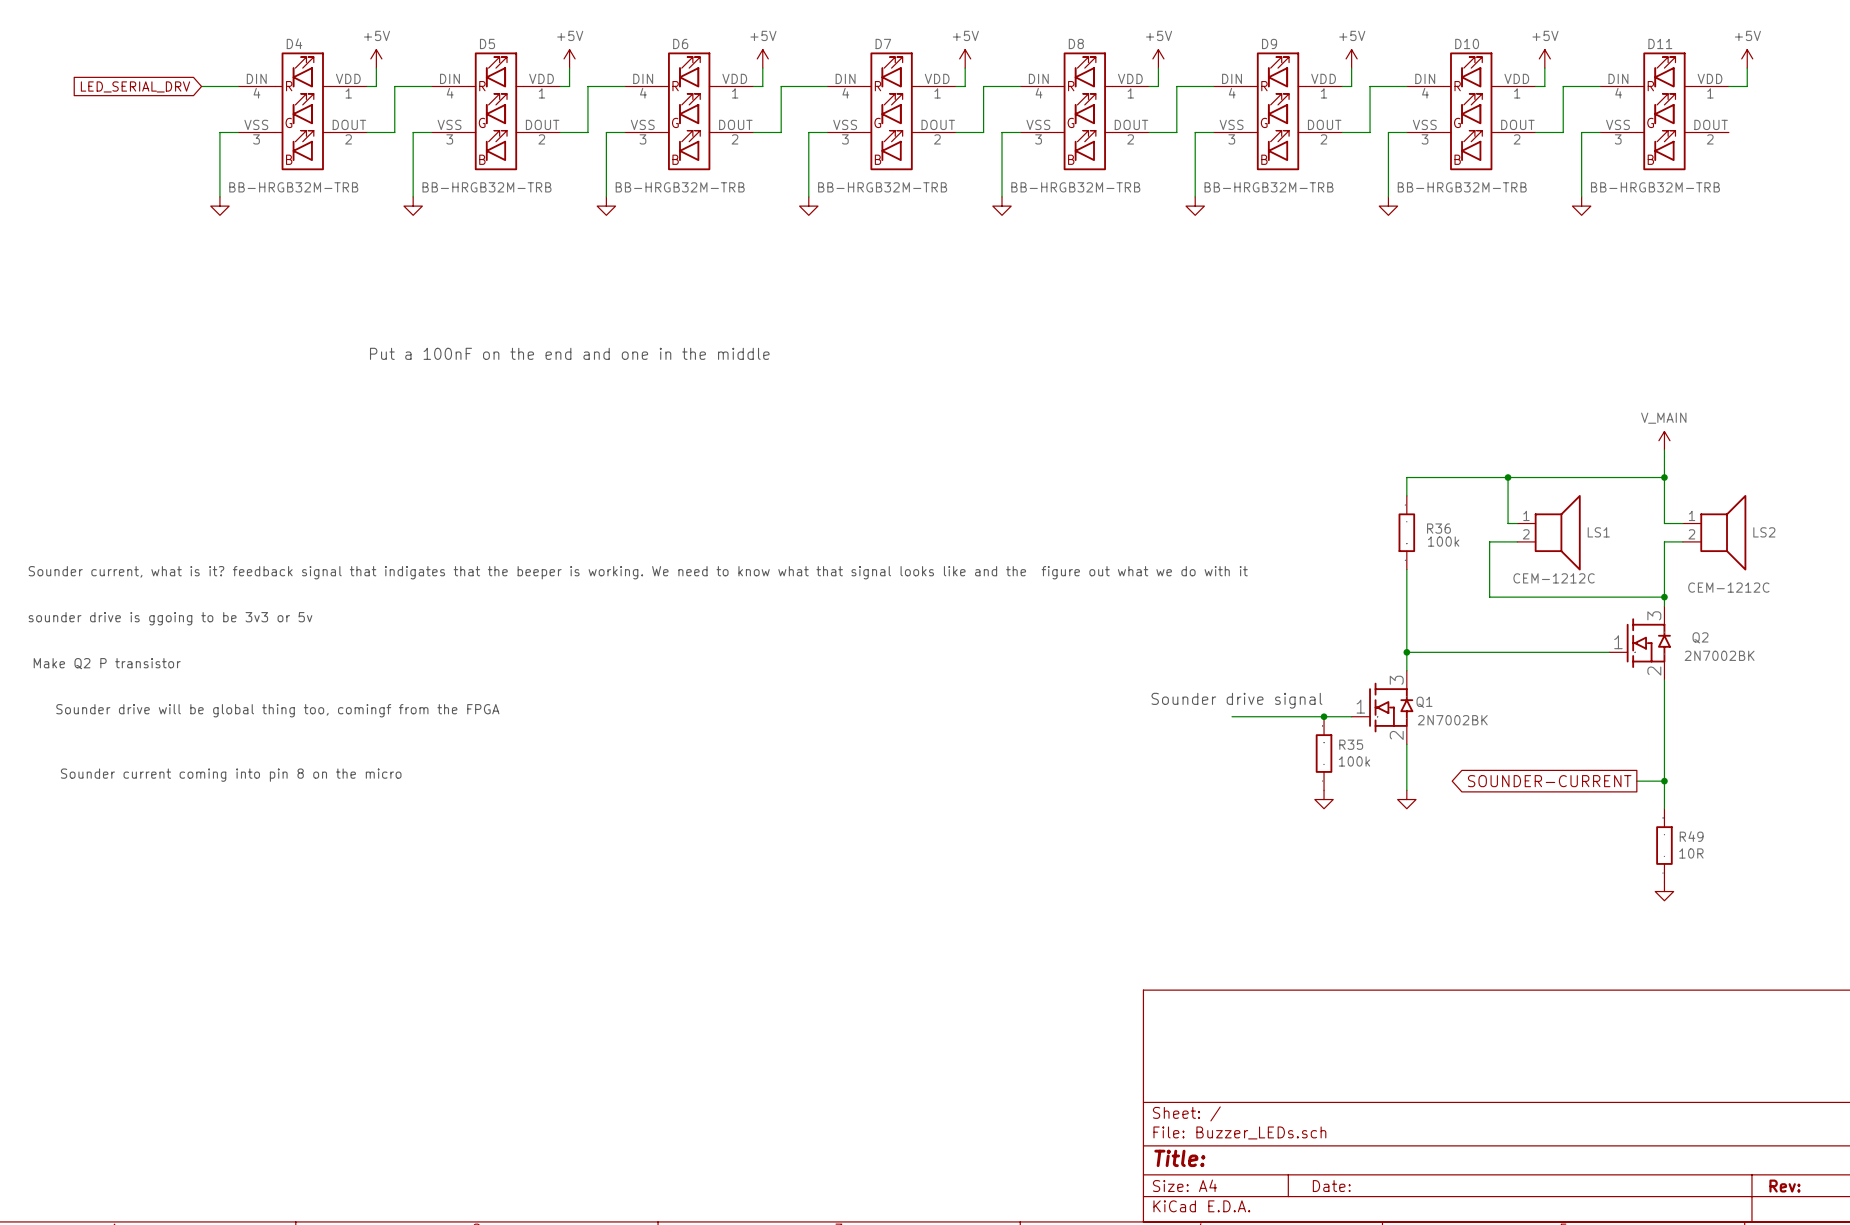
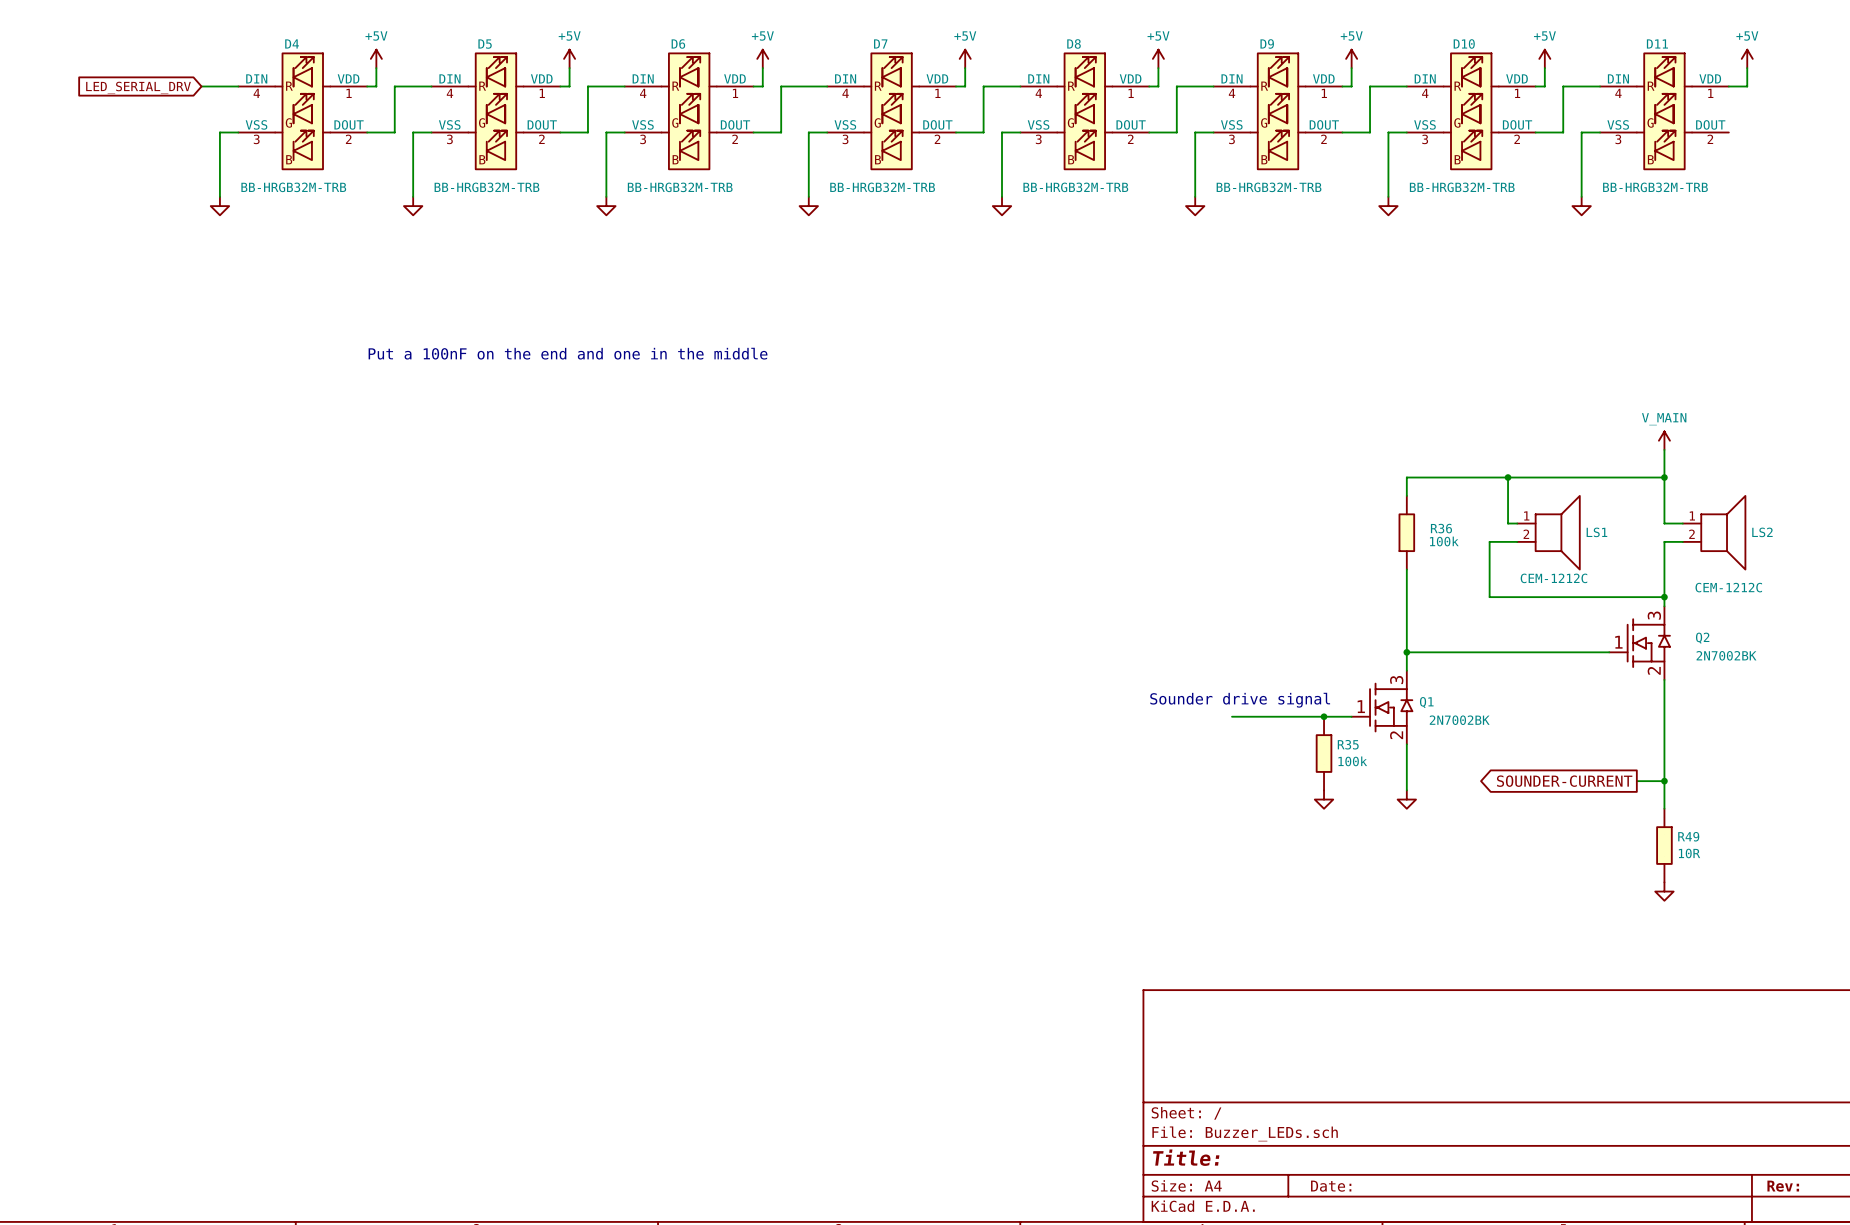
text: Sounder current, what is it? feedback signal that indigates that the beeper is working. We need to know what that signal looks like and the figure out what we do with it (638, 572) -> none
text: sounder drive is ggoing to be 3v3 or 5v (170, 618) -> none
text: Make Q2 P transistor (107, 663) -> none
text: Sounder drive will be global thing too, comingf from the FPGA (277, 710) -> none
text: Sounder current coming into pin 8 on the micro (231, 775) -> none

